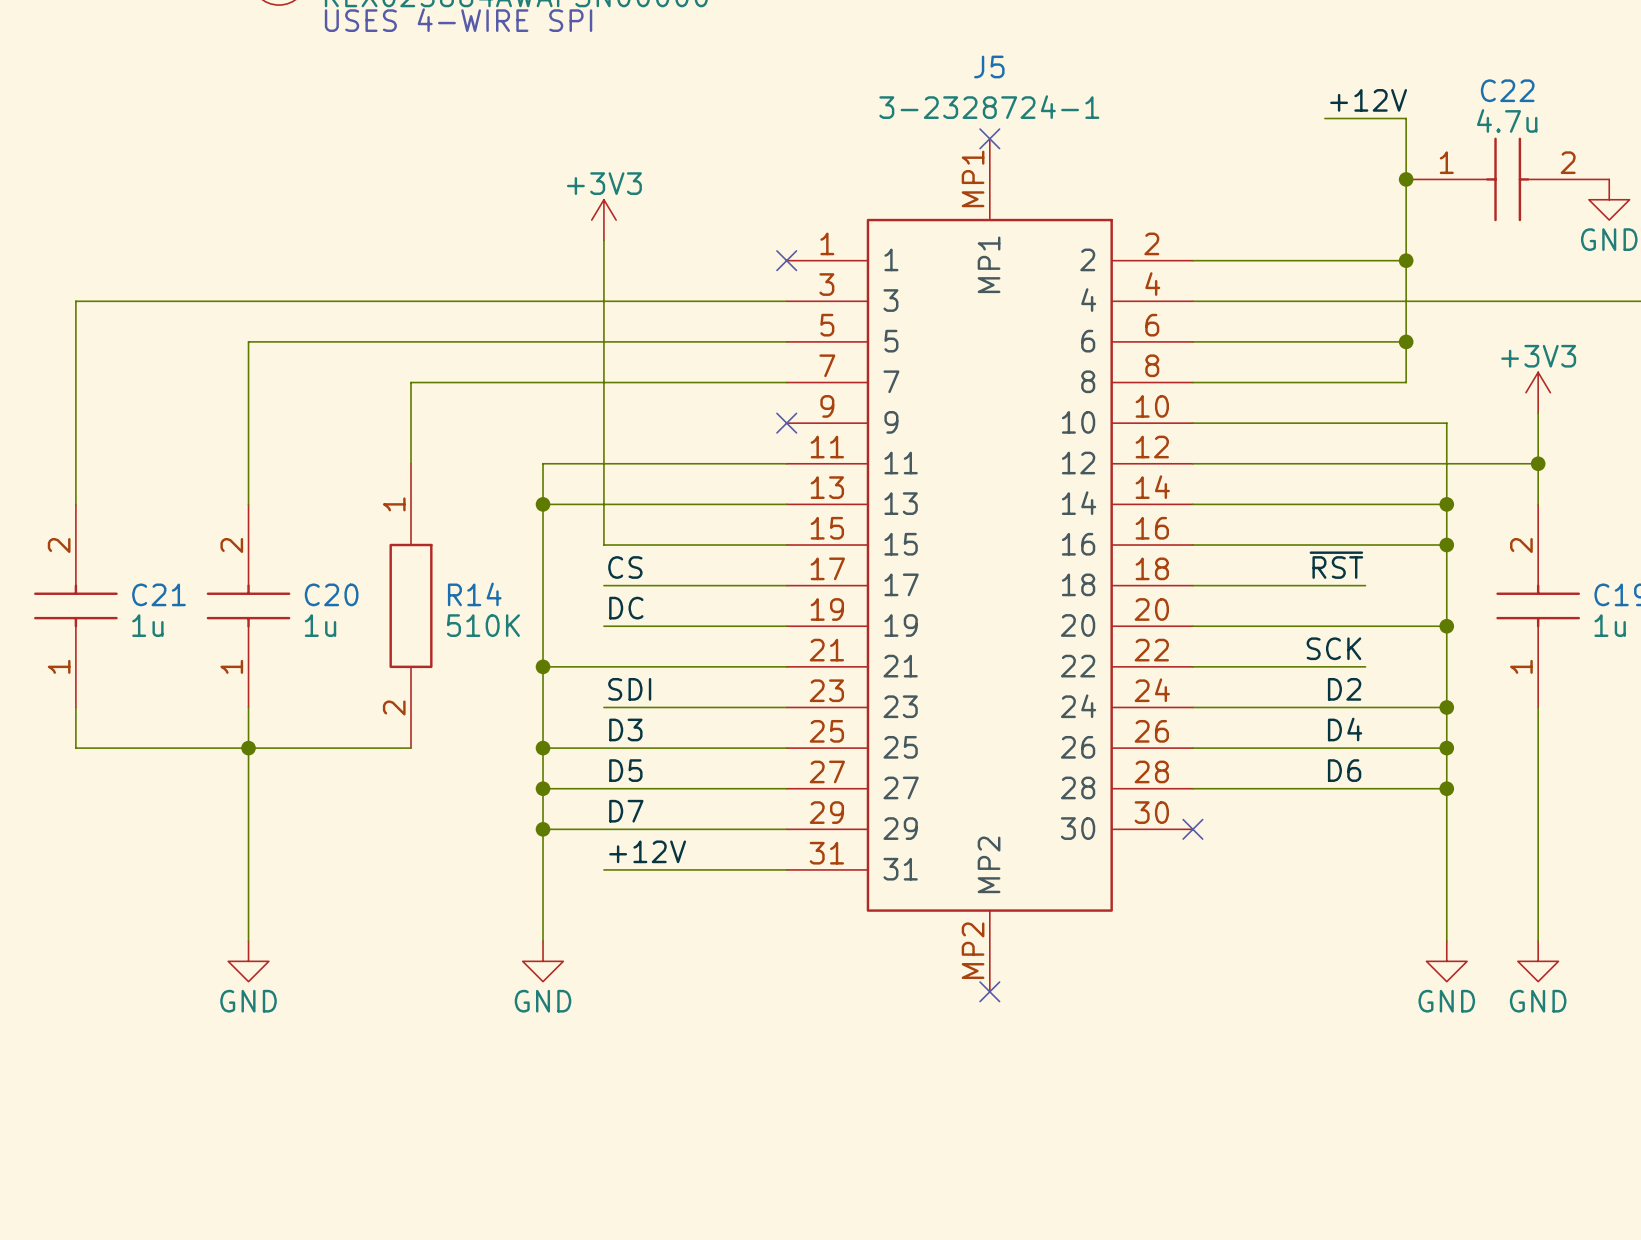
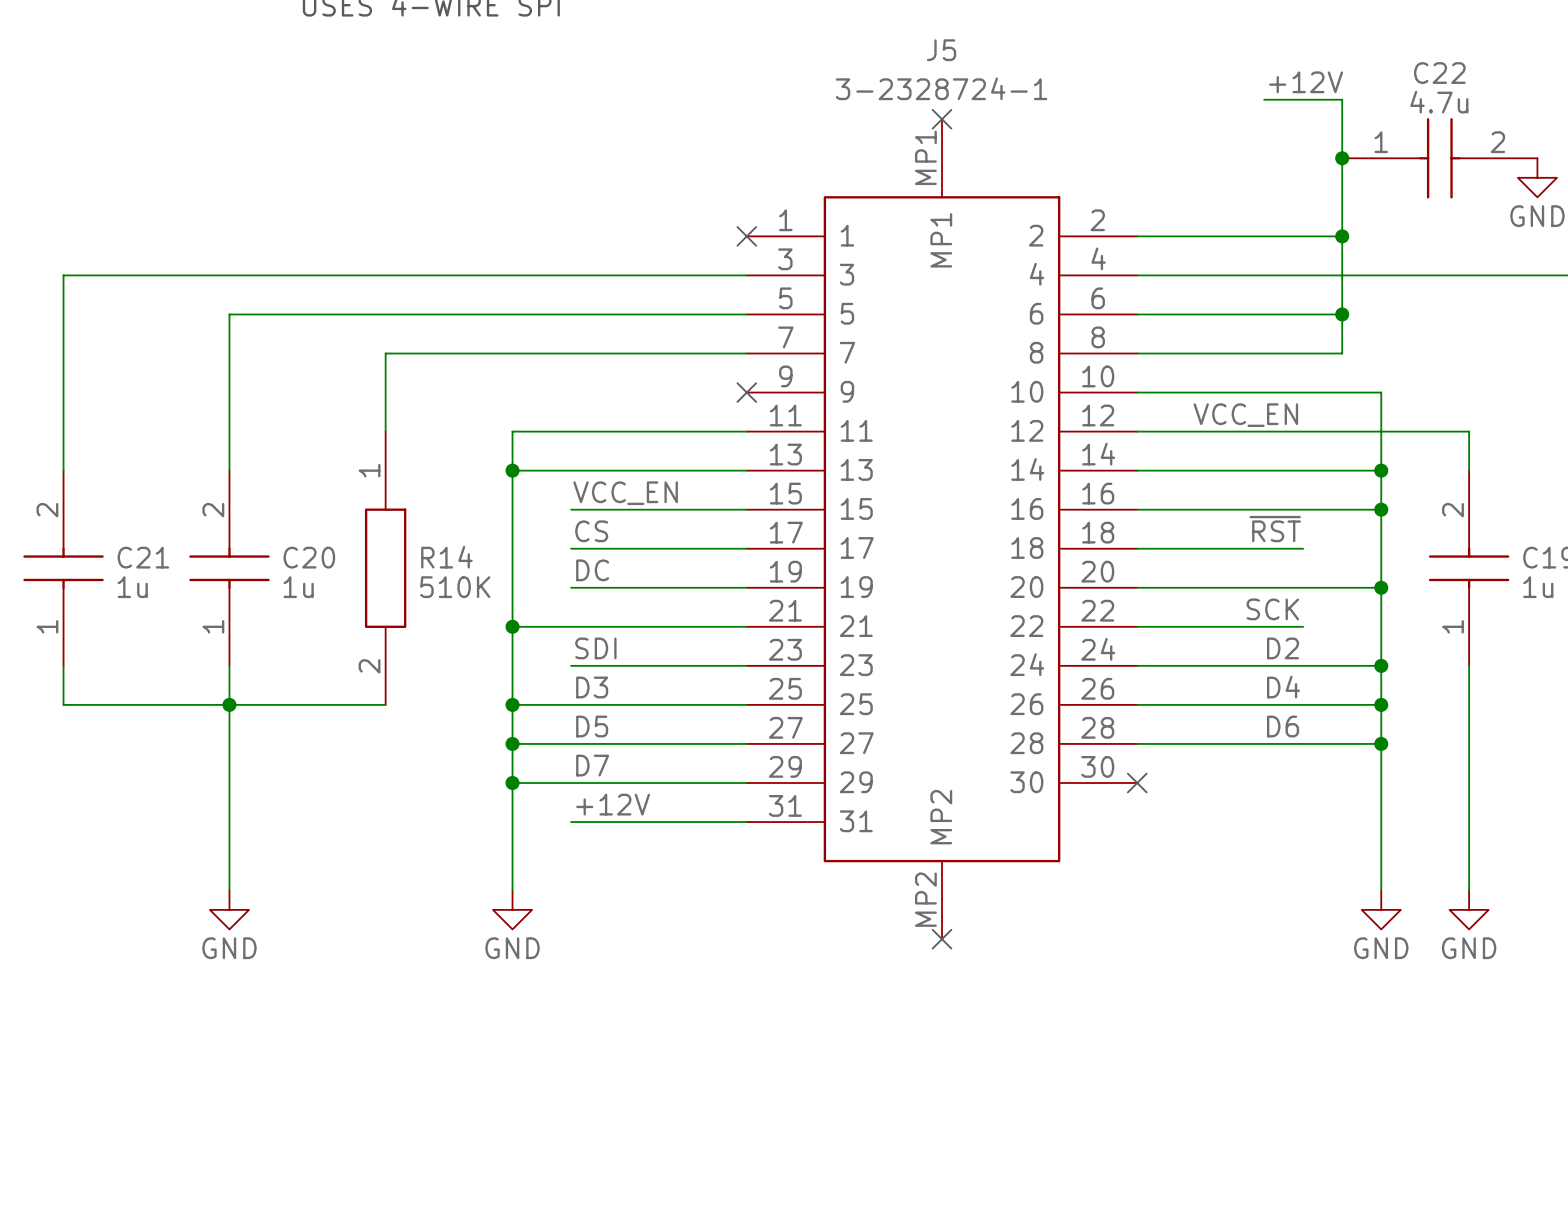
power symbol: +3V3 (603, 220) -> none
wire: (603, 240) (603, 545) -> none
power symbol: +3V3 (1538, 392) -> none
wire: (1538, 412) (1538, 463) -> none
label: none -> VCC_EN (1245, 415)
junction: (1538, 463) -> none
label: none -> VCC_EN (625, 493)

